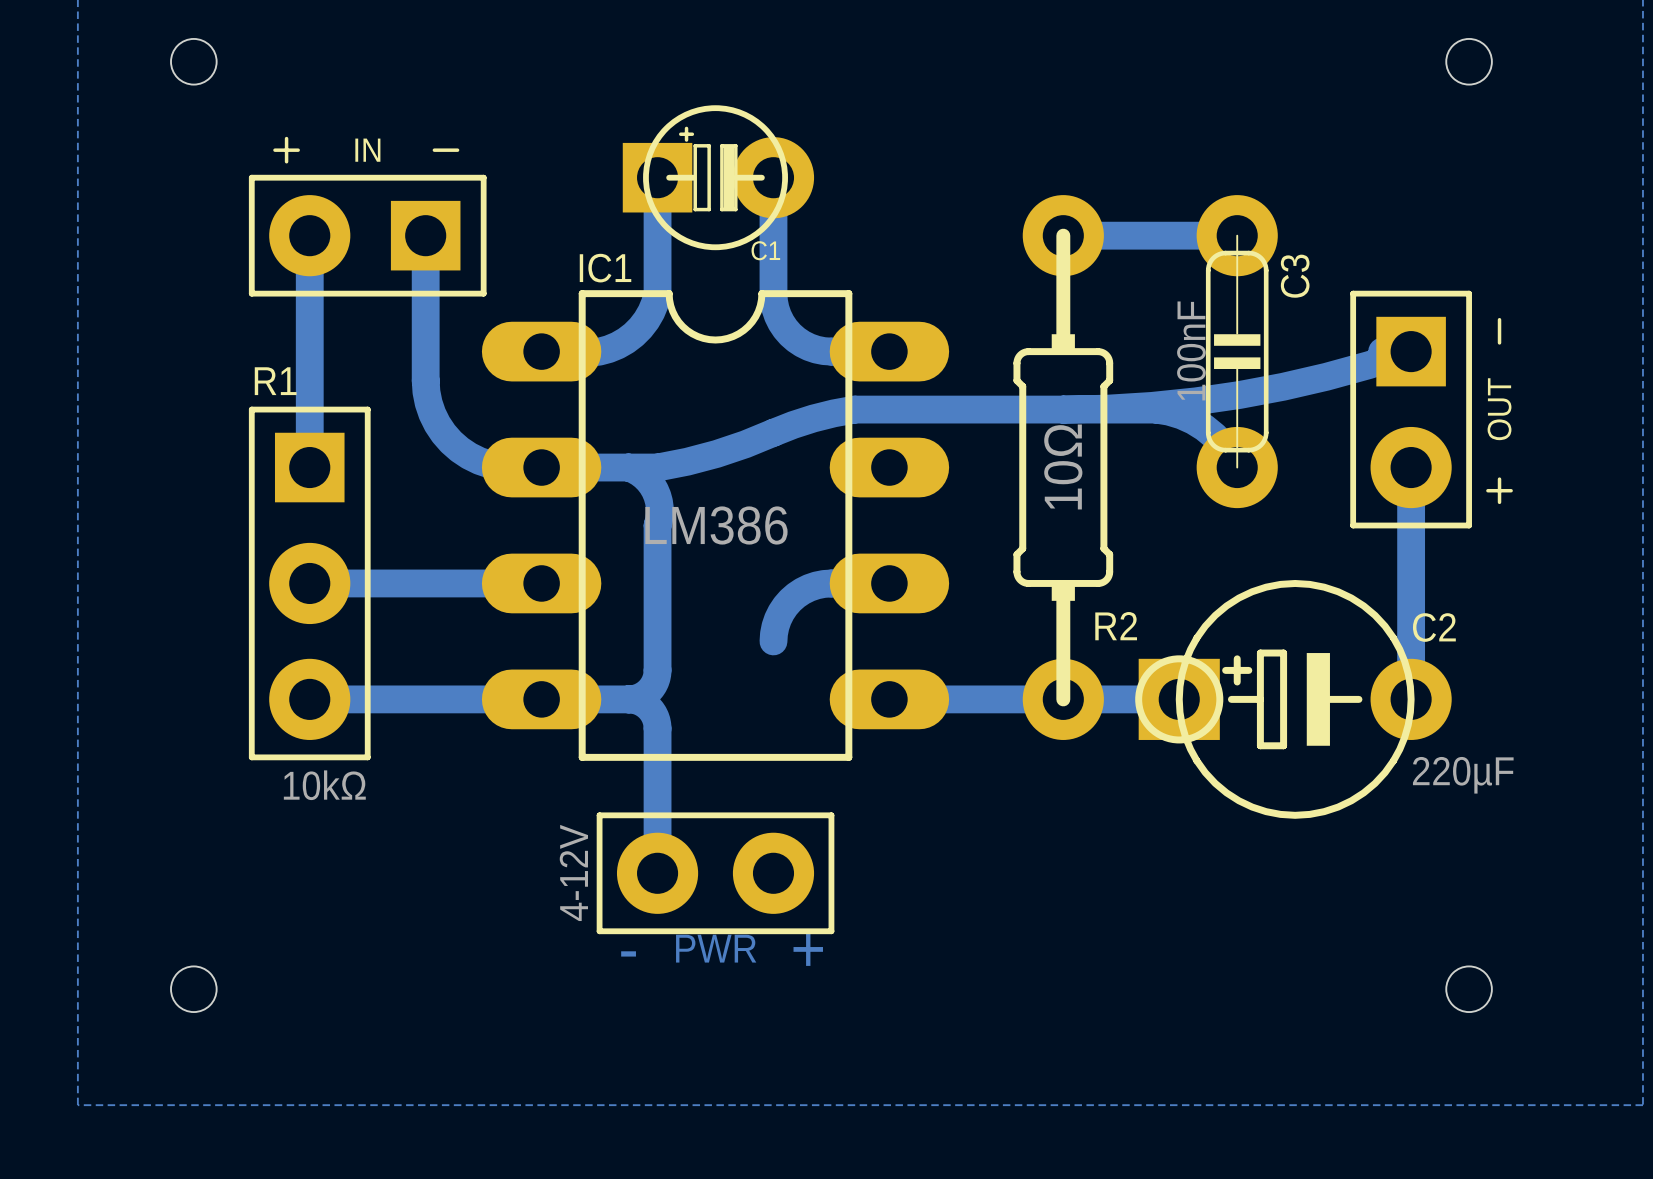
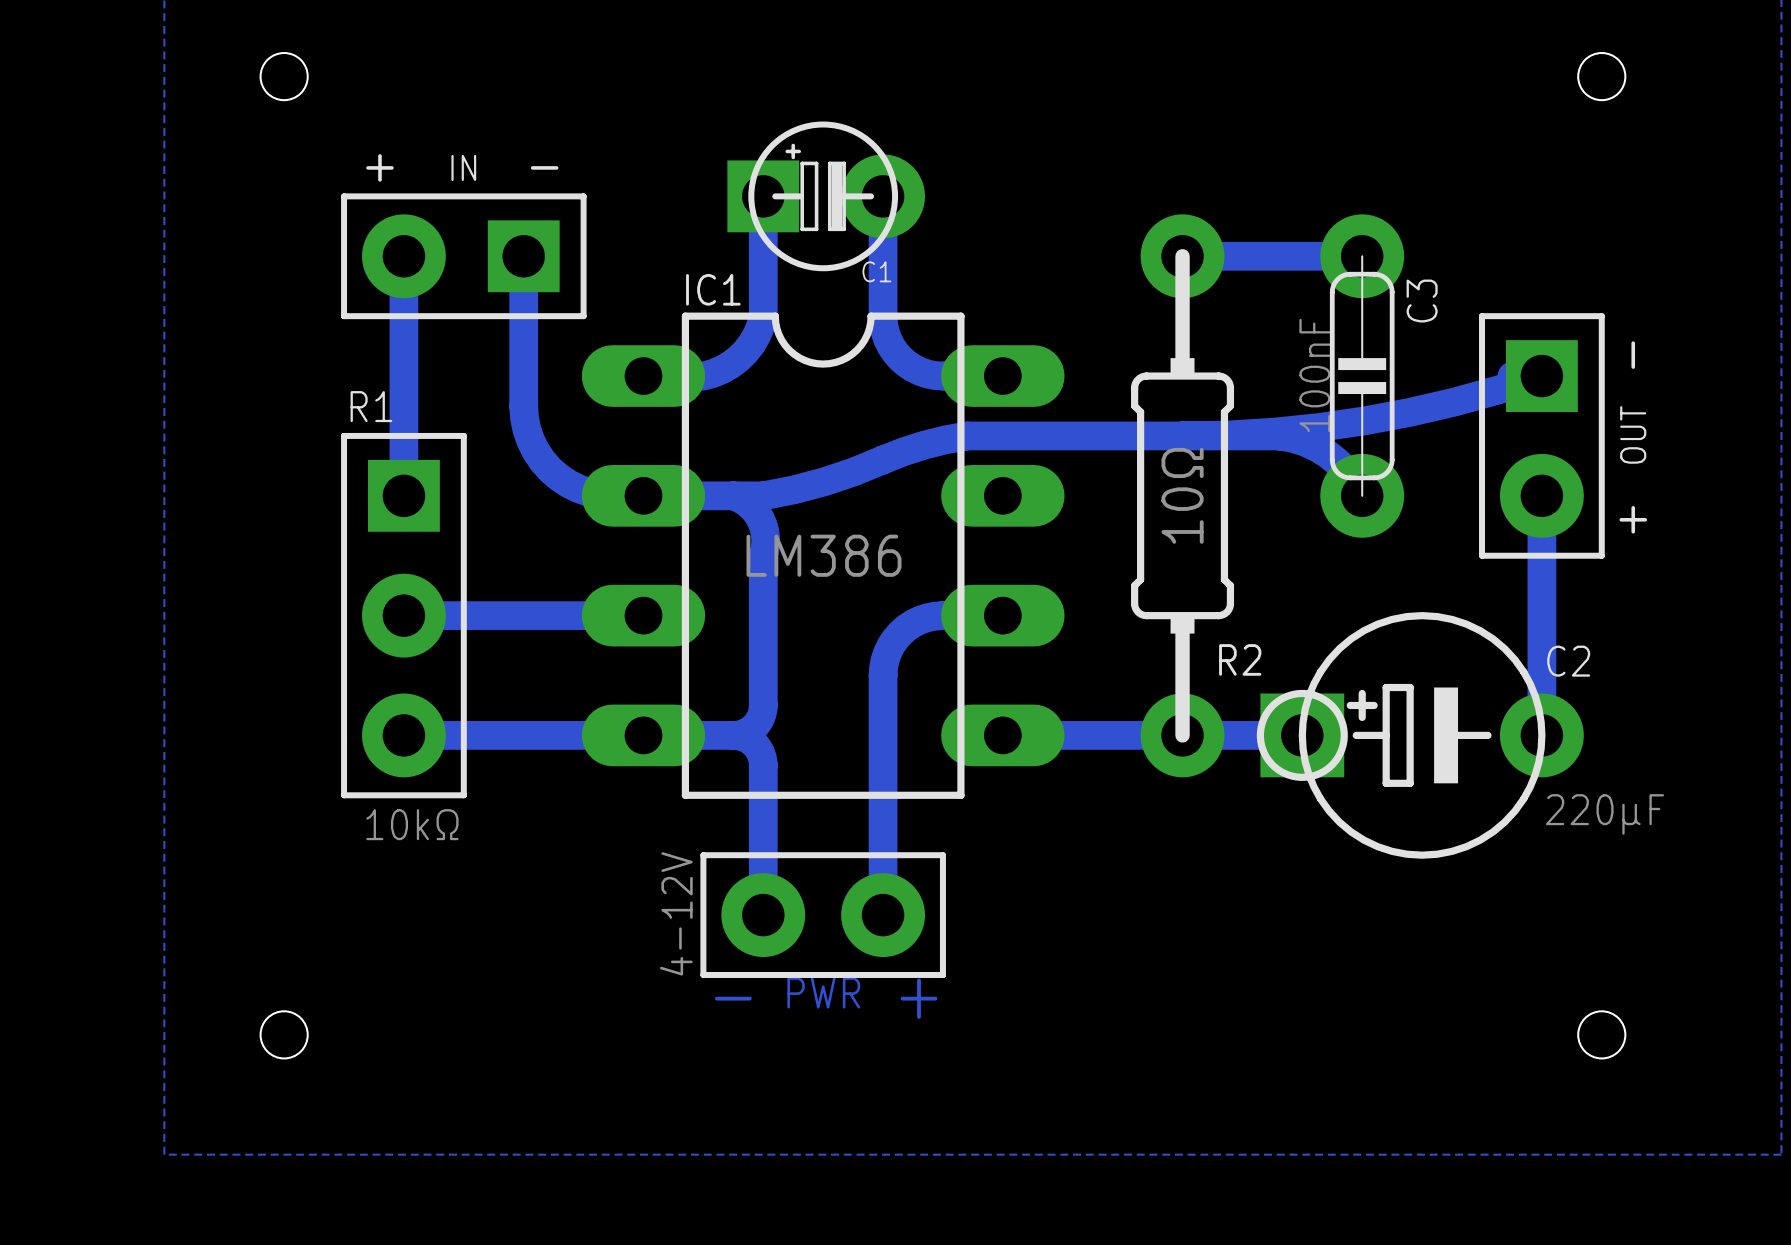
bottom track: none -> (883, 675) (883, 915)

